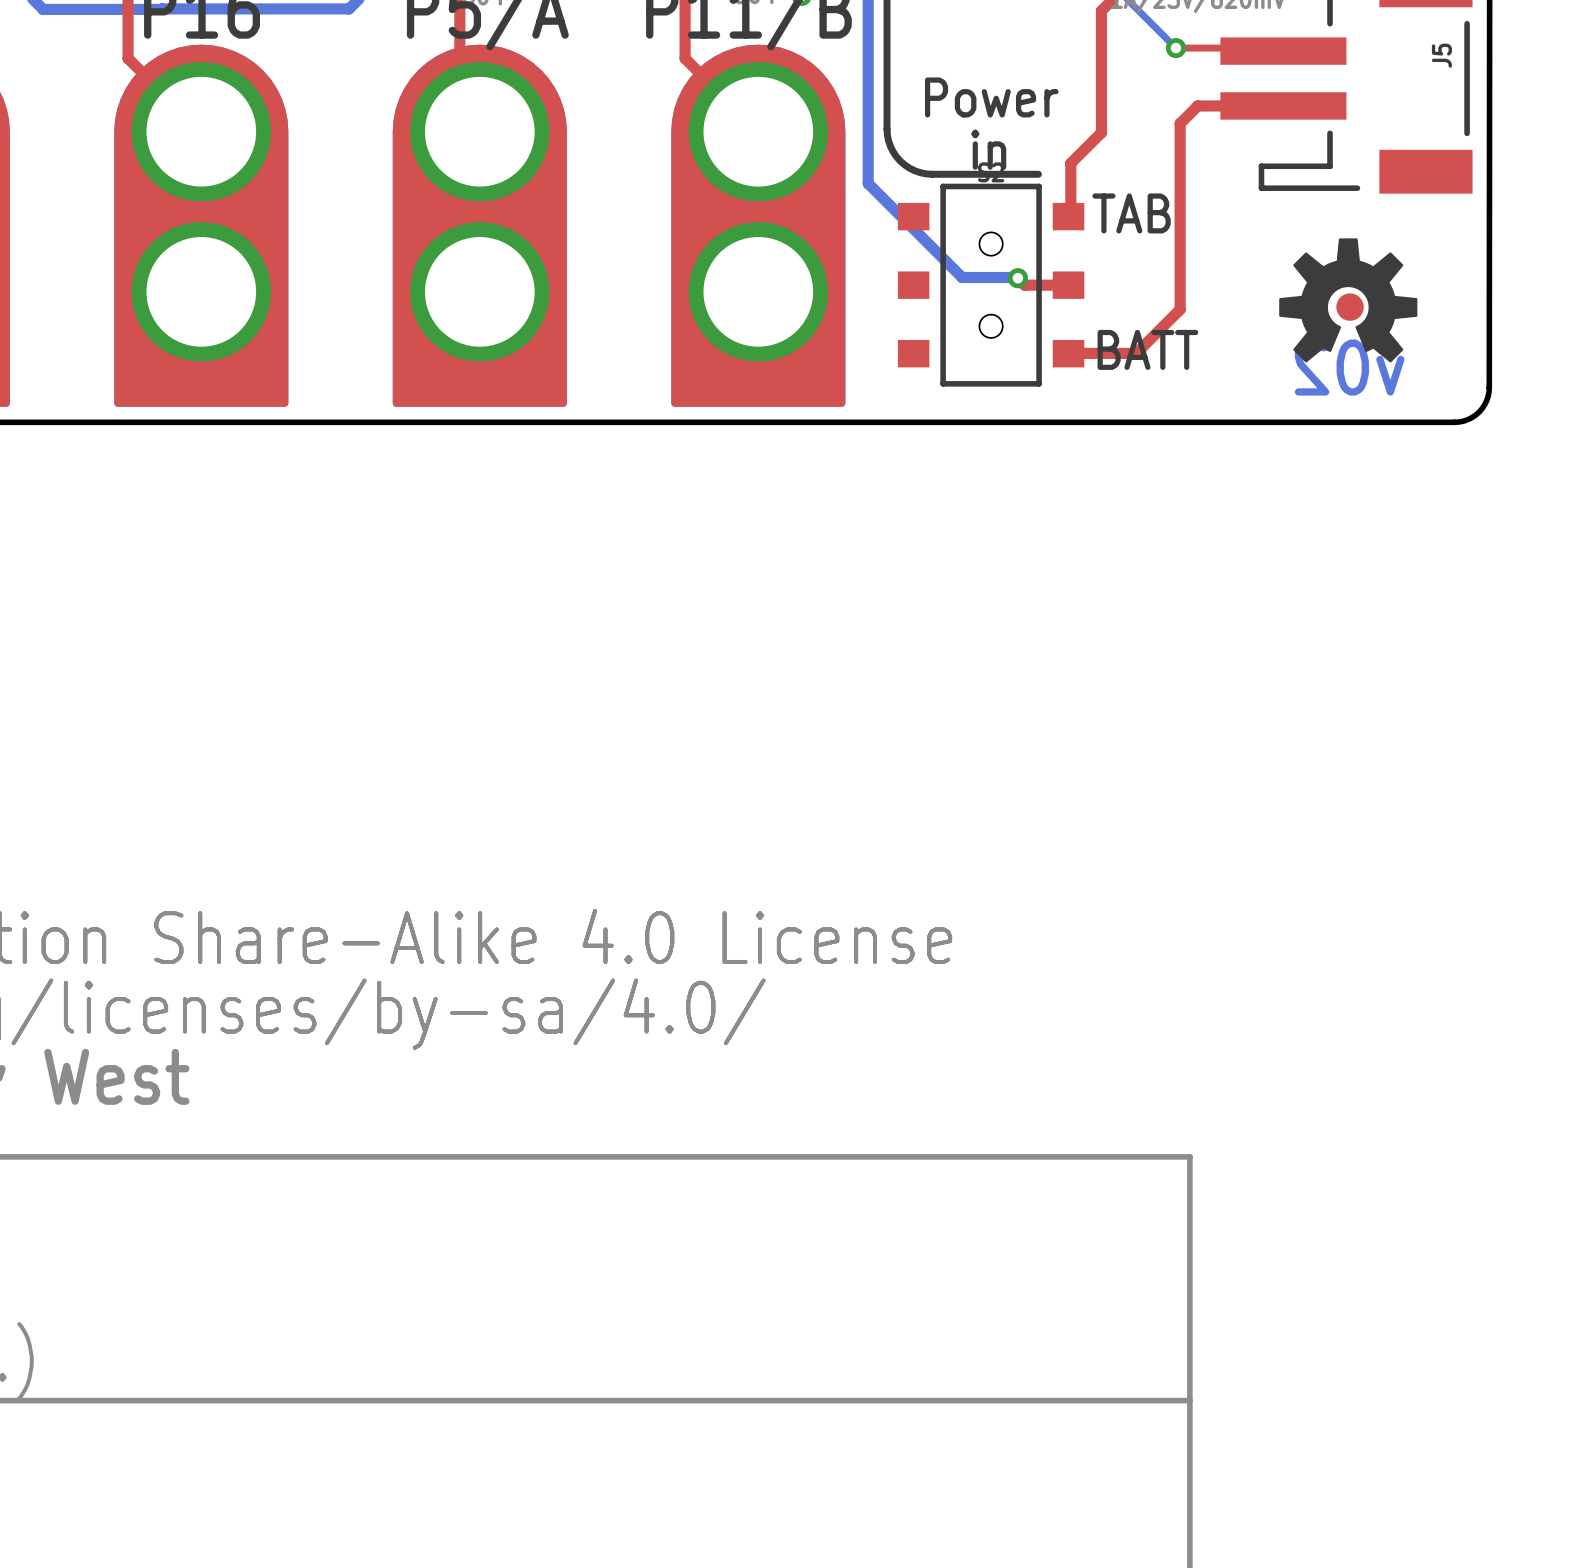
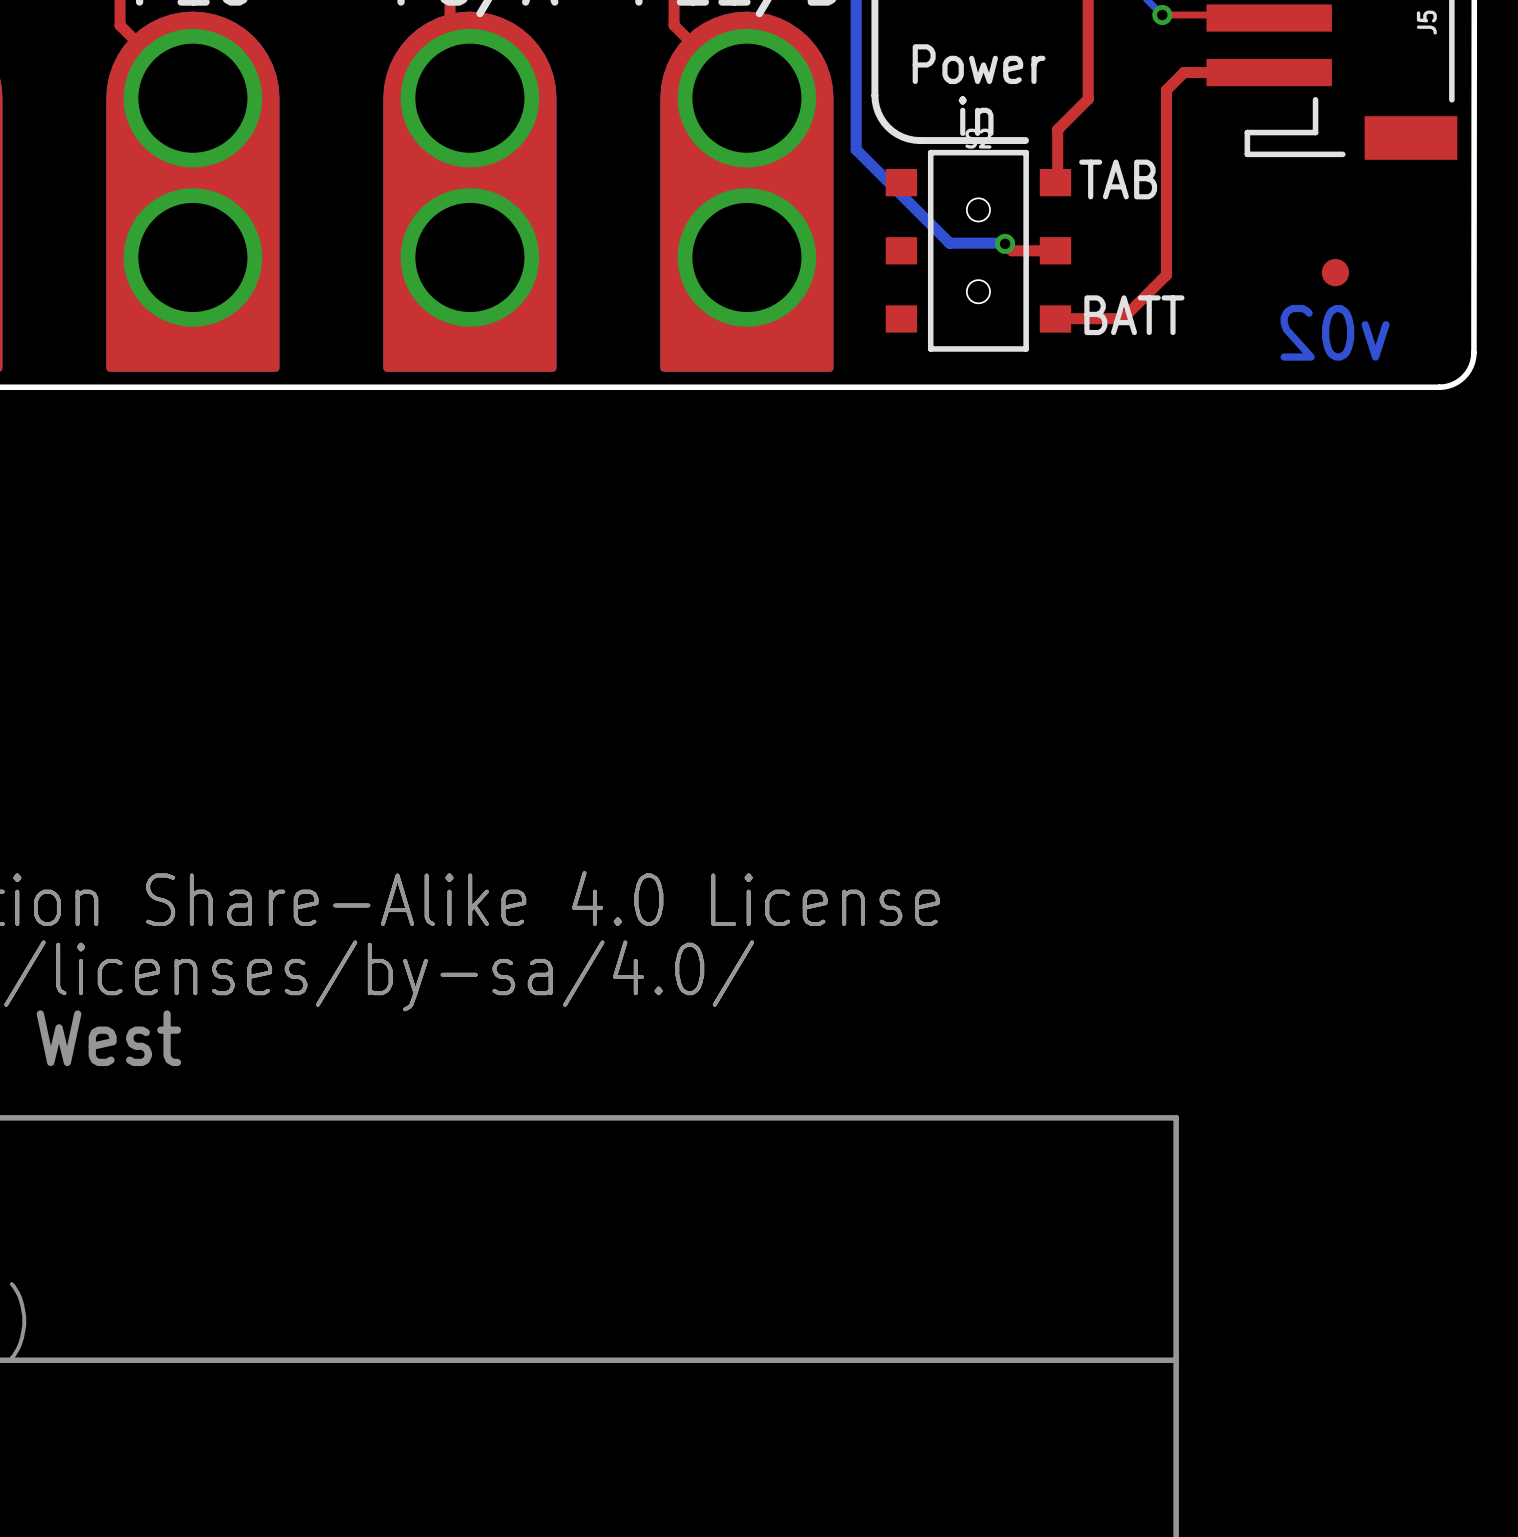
drawing: [1279, 238, 1418, 363] -> none

